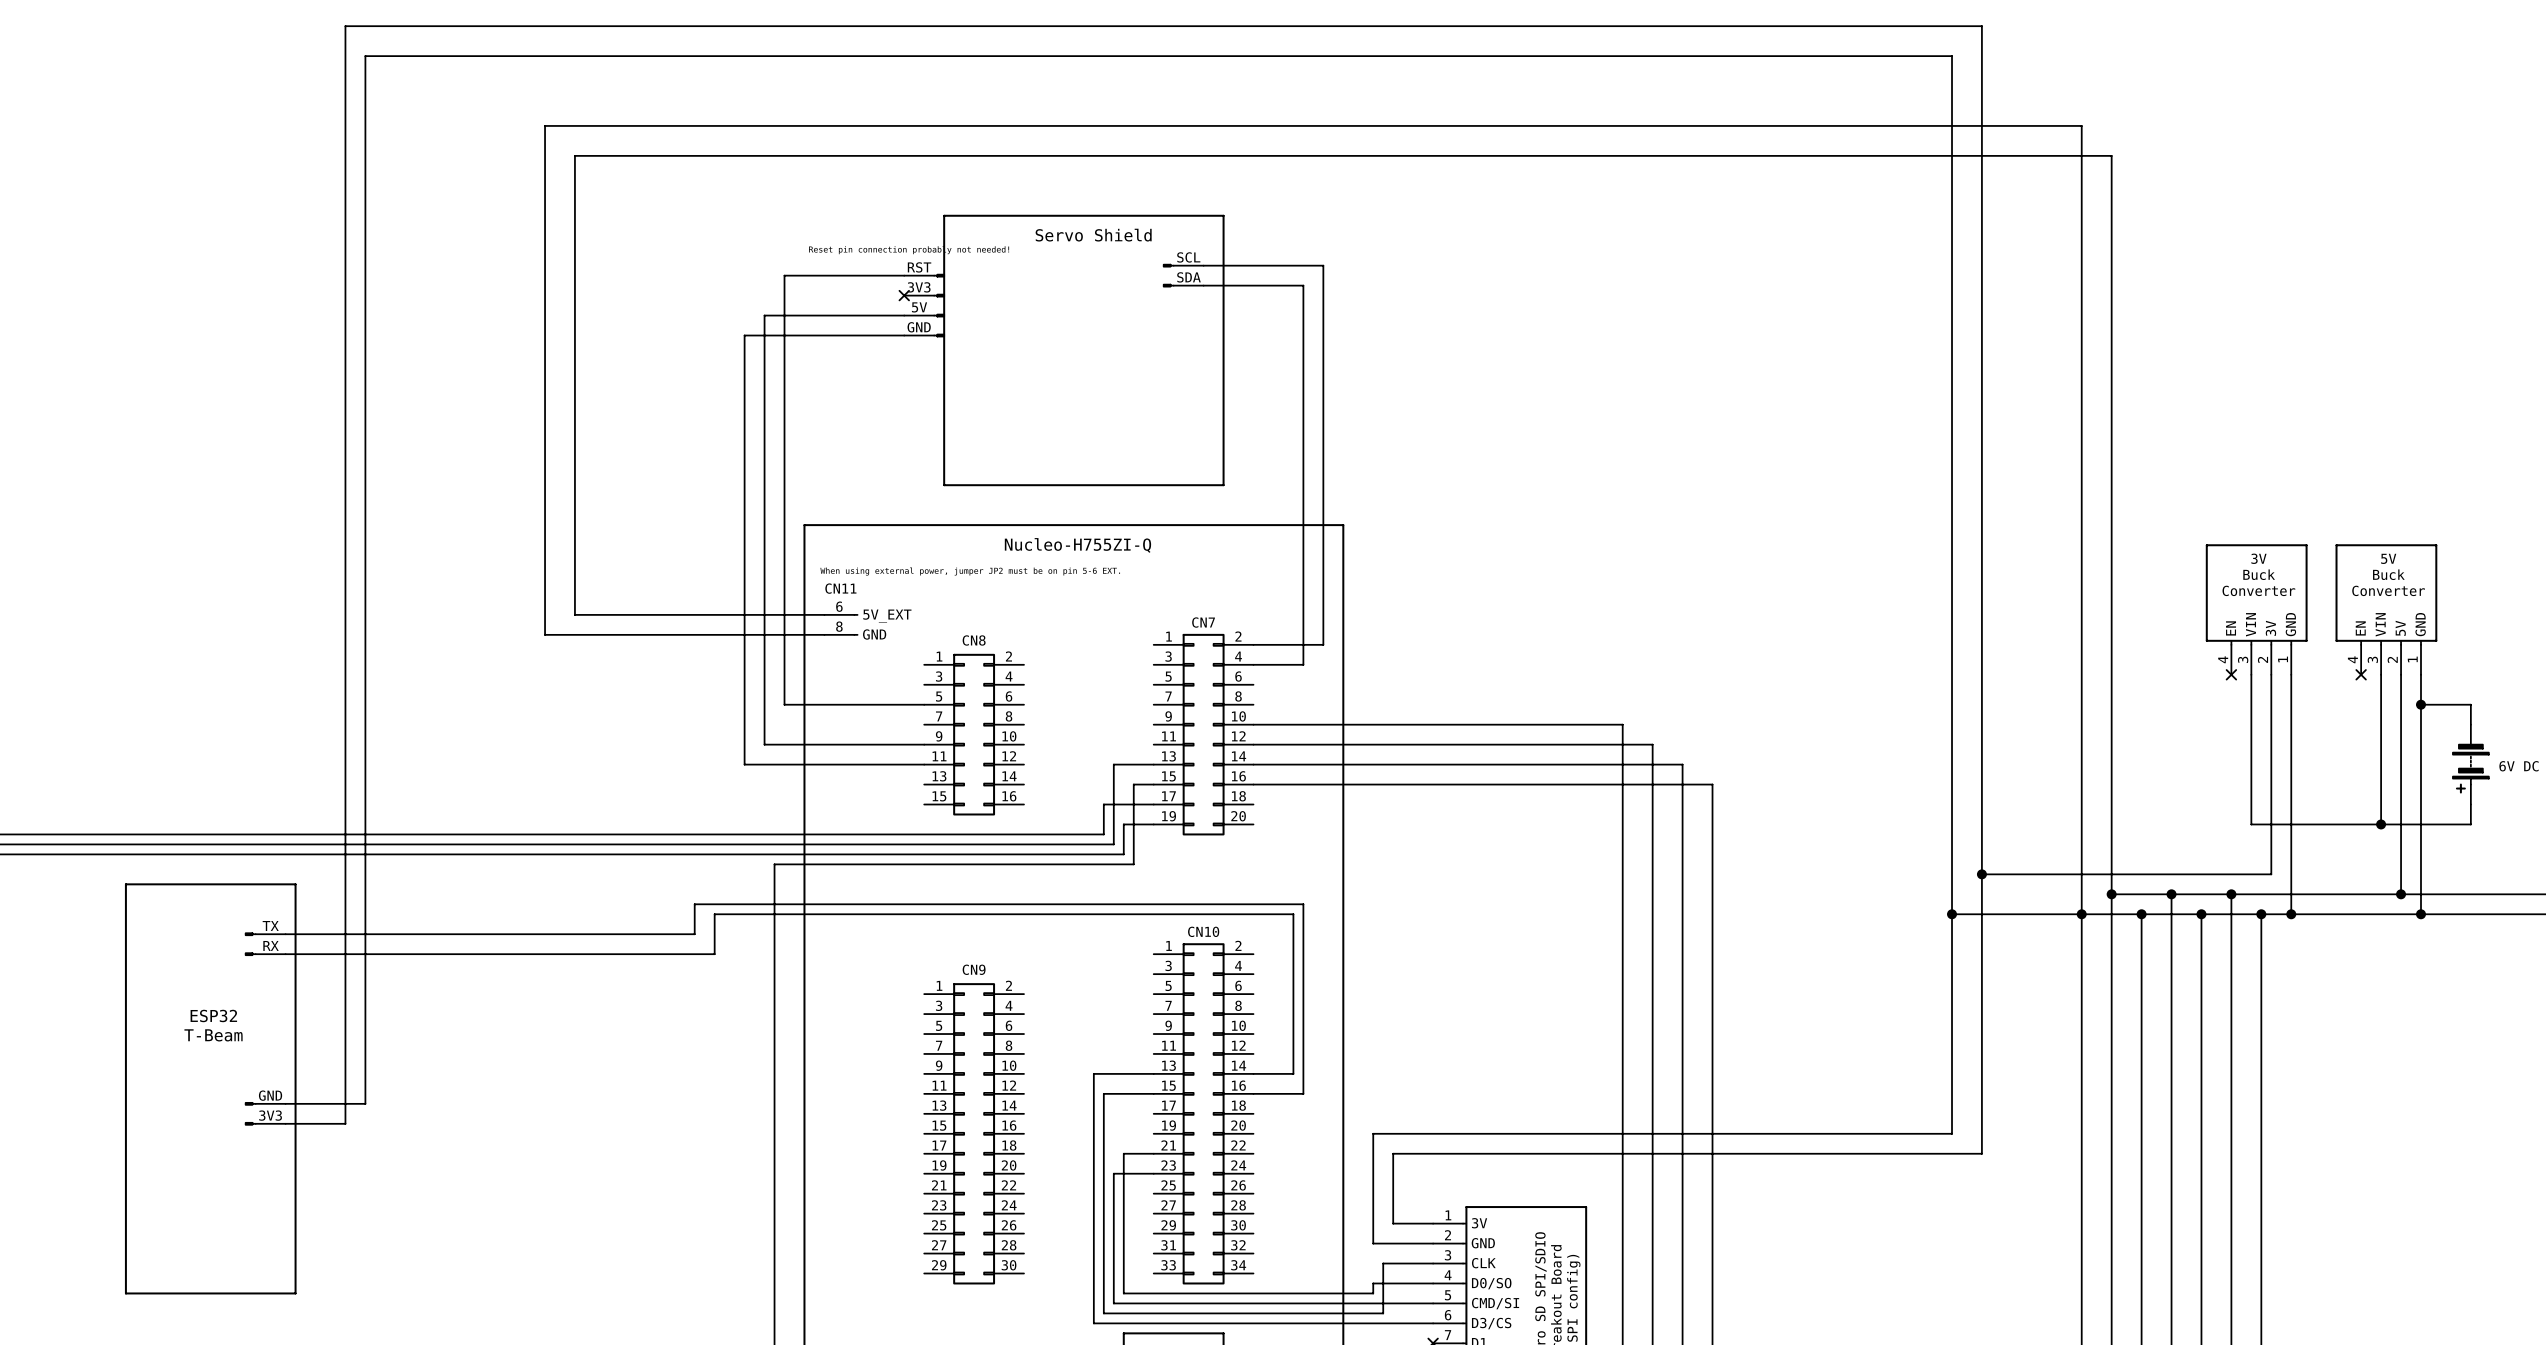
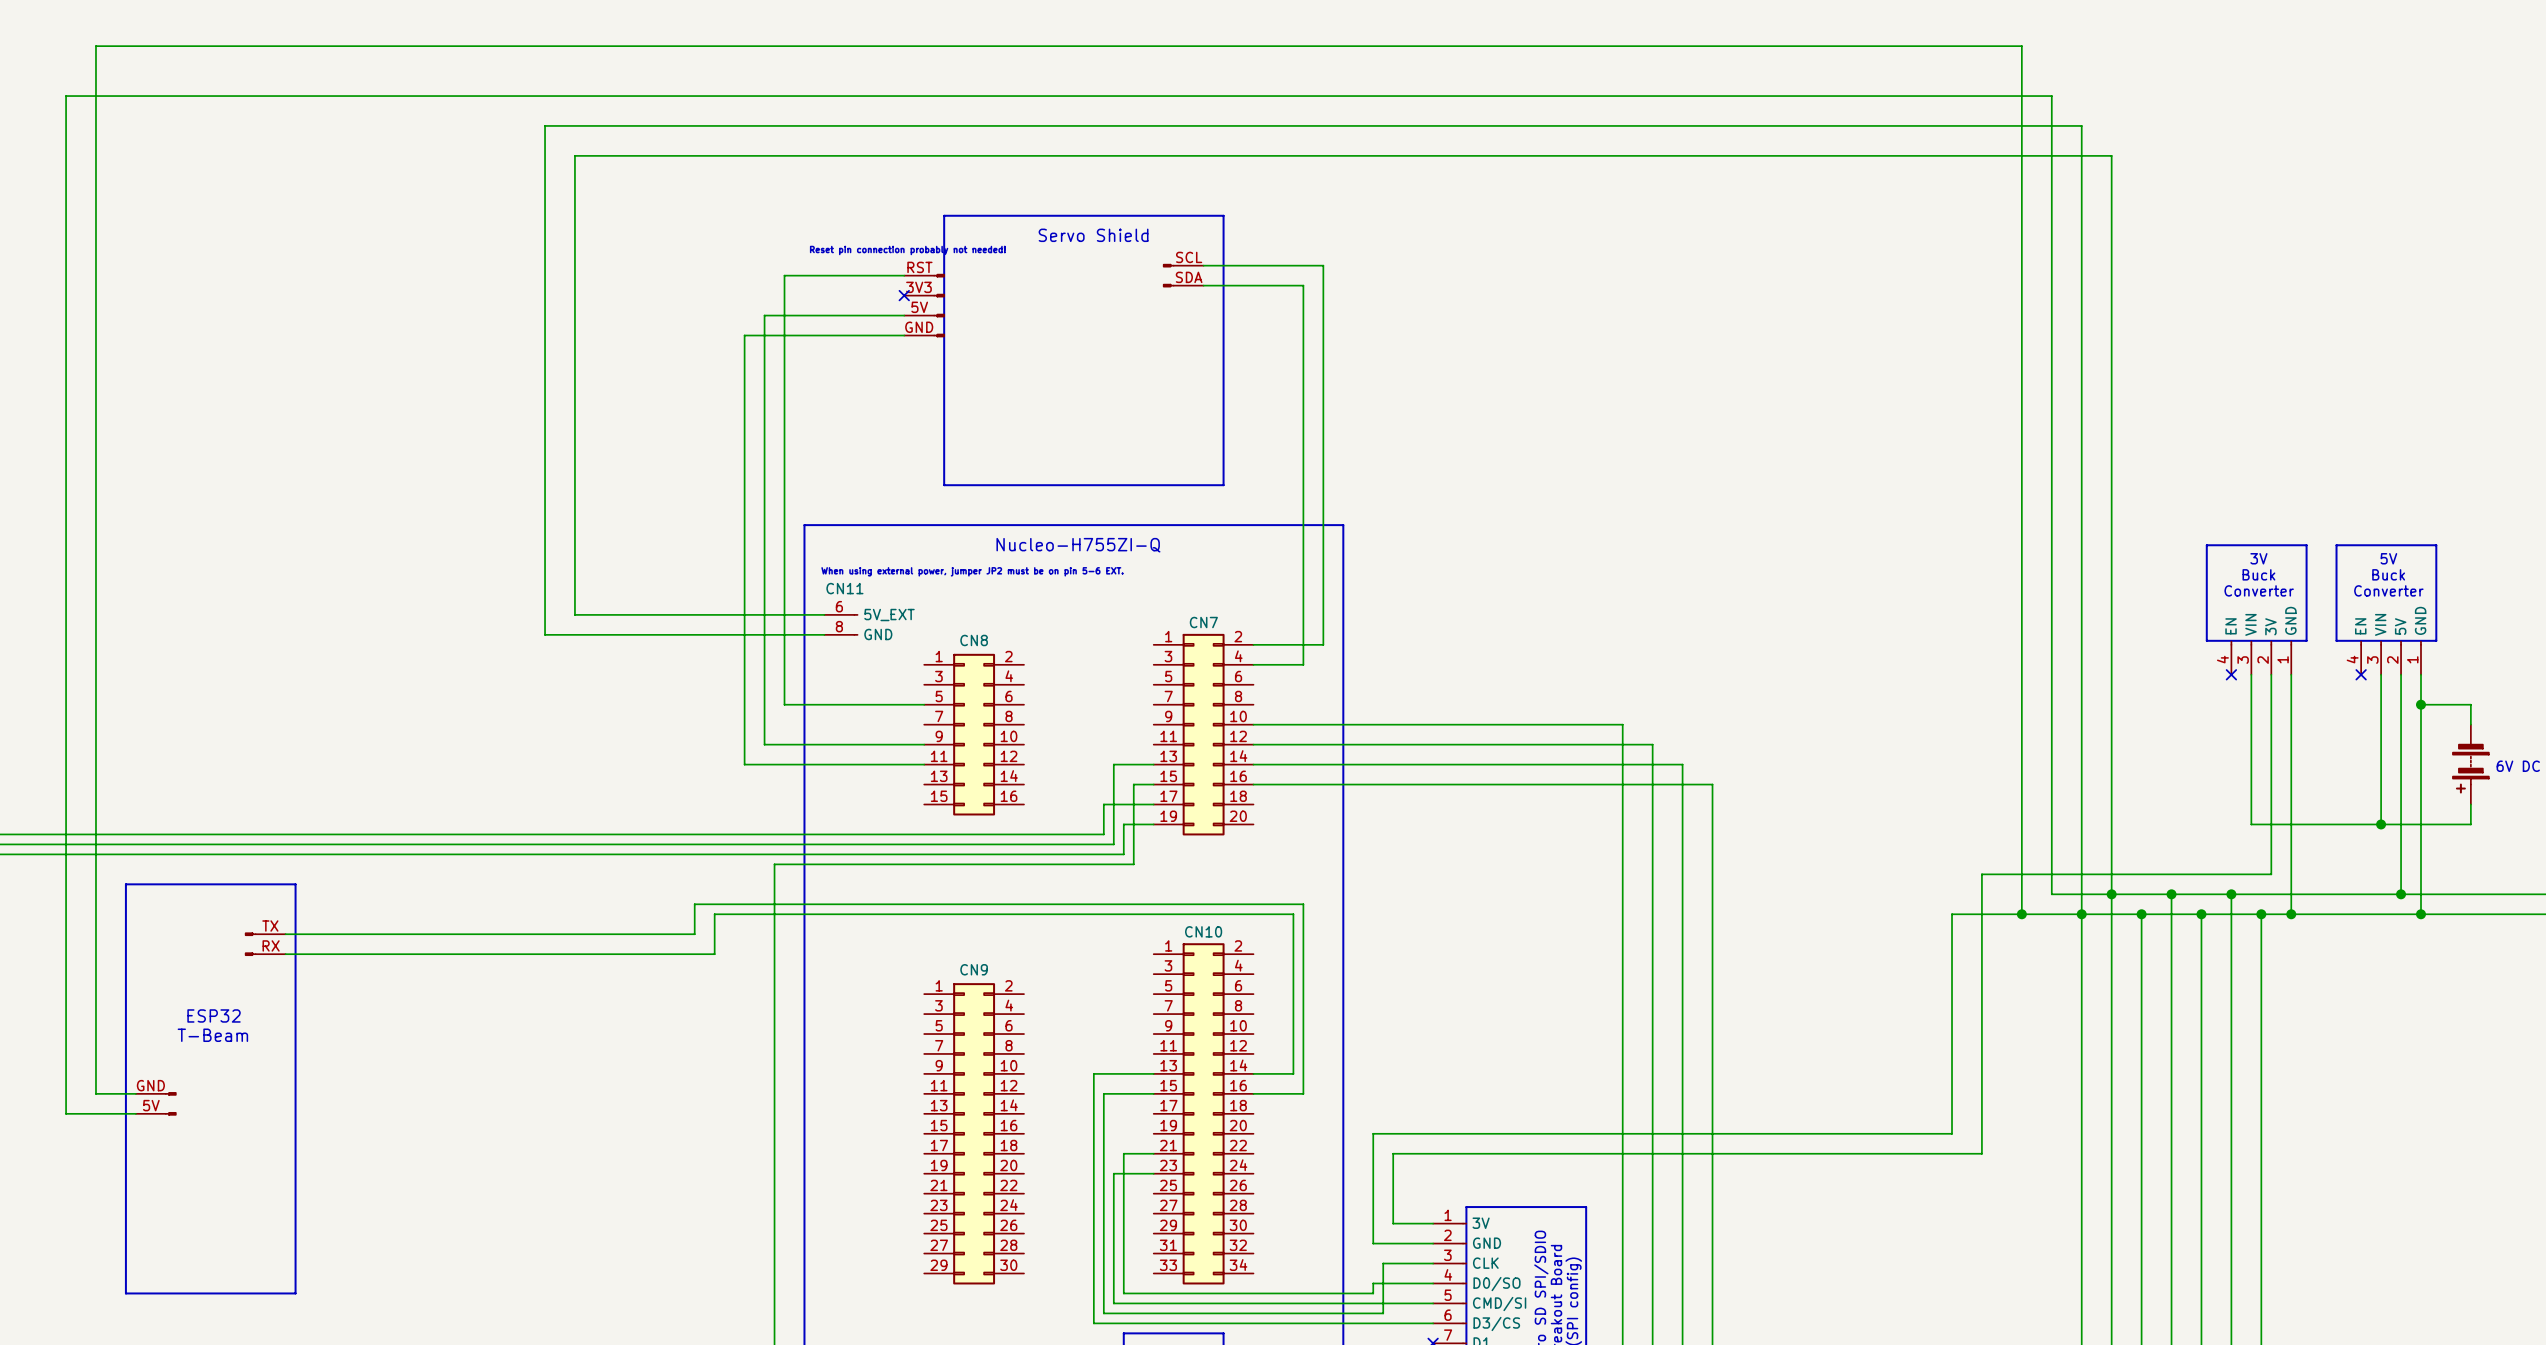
wire: (1981, 874) (1981, 26) (345, 26) (345, 1123) (285, 1123) -> none
junction: (1981, 874) -> none
wire: none -> (2111, 894) (2051, 894) (2051, 96) (66, 96) (66, 1113) (135, 1113)
wire: (1952, 914) (1952, 56) (365, 56) (365, 1103) (285, 1103) -> none
junction: (1952, 914) -> none
wire: none -> (2021, 914) (2021, 46) (95, 46) (95, 1093) (135, 1093)
junction: none -> (2021, 914)
part: none -> (156, 1103)
part: (265, 1113) -> none

